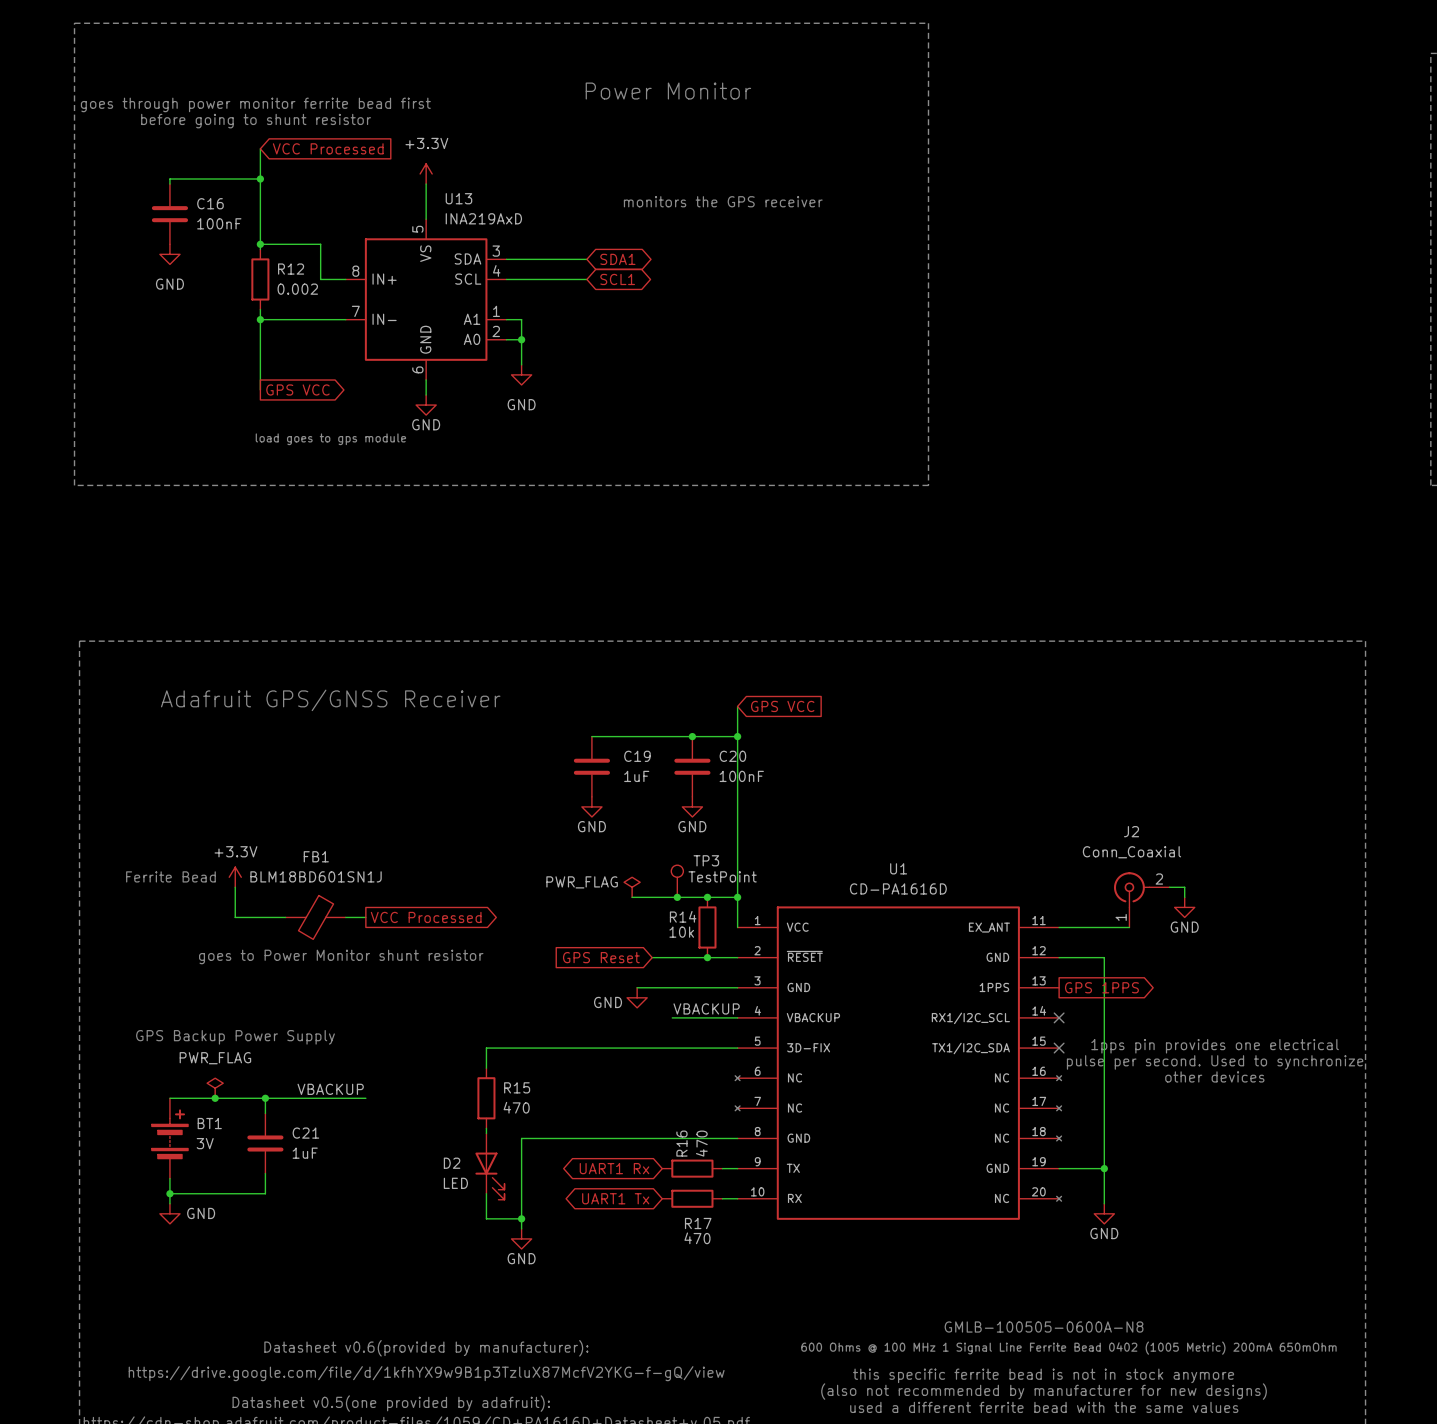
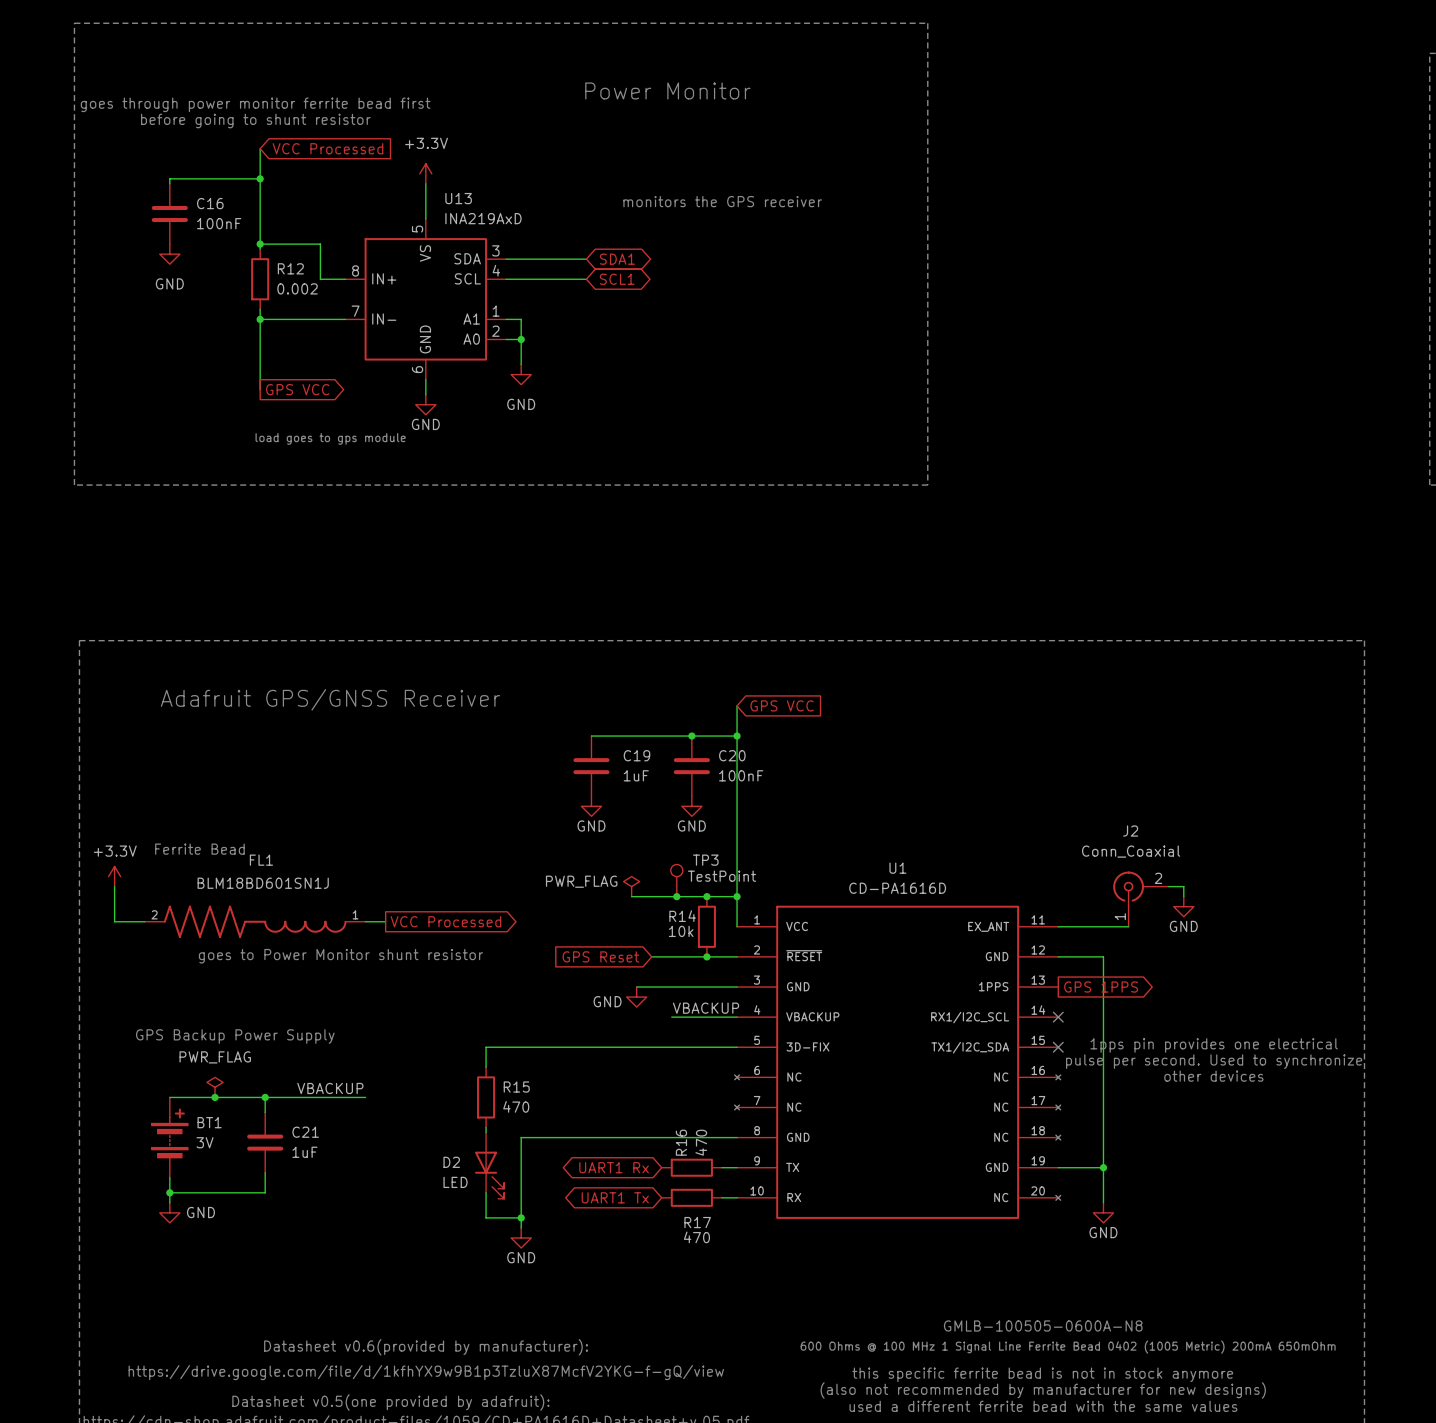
text position: Ferrite Bead (170, 876) -> Ferrite Bead (199, 849)
power symbol position: +3.3V (235, 877) -> +3.3V (114, 876)
wire: none -> (114, 886) (114, 921) (144, 921)
wire: (235, 887) (235, 917) (285, 917) -> none
FB1: BLM18BD601SN1J (315, 917) -> none
wire: (345, 917) (365, 917) -> (365, 921) (385, 921)
global label position: VCC Processed (426, 917) -> VCC Processed (445, 921)
FL1: none -> BLM18BD601SN1J (255, 921)

